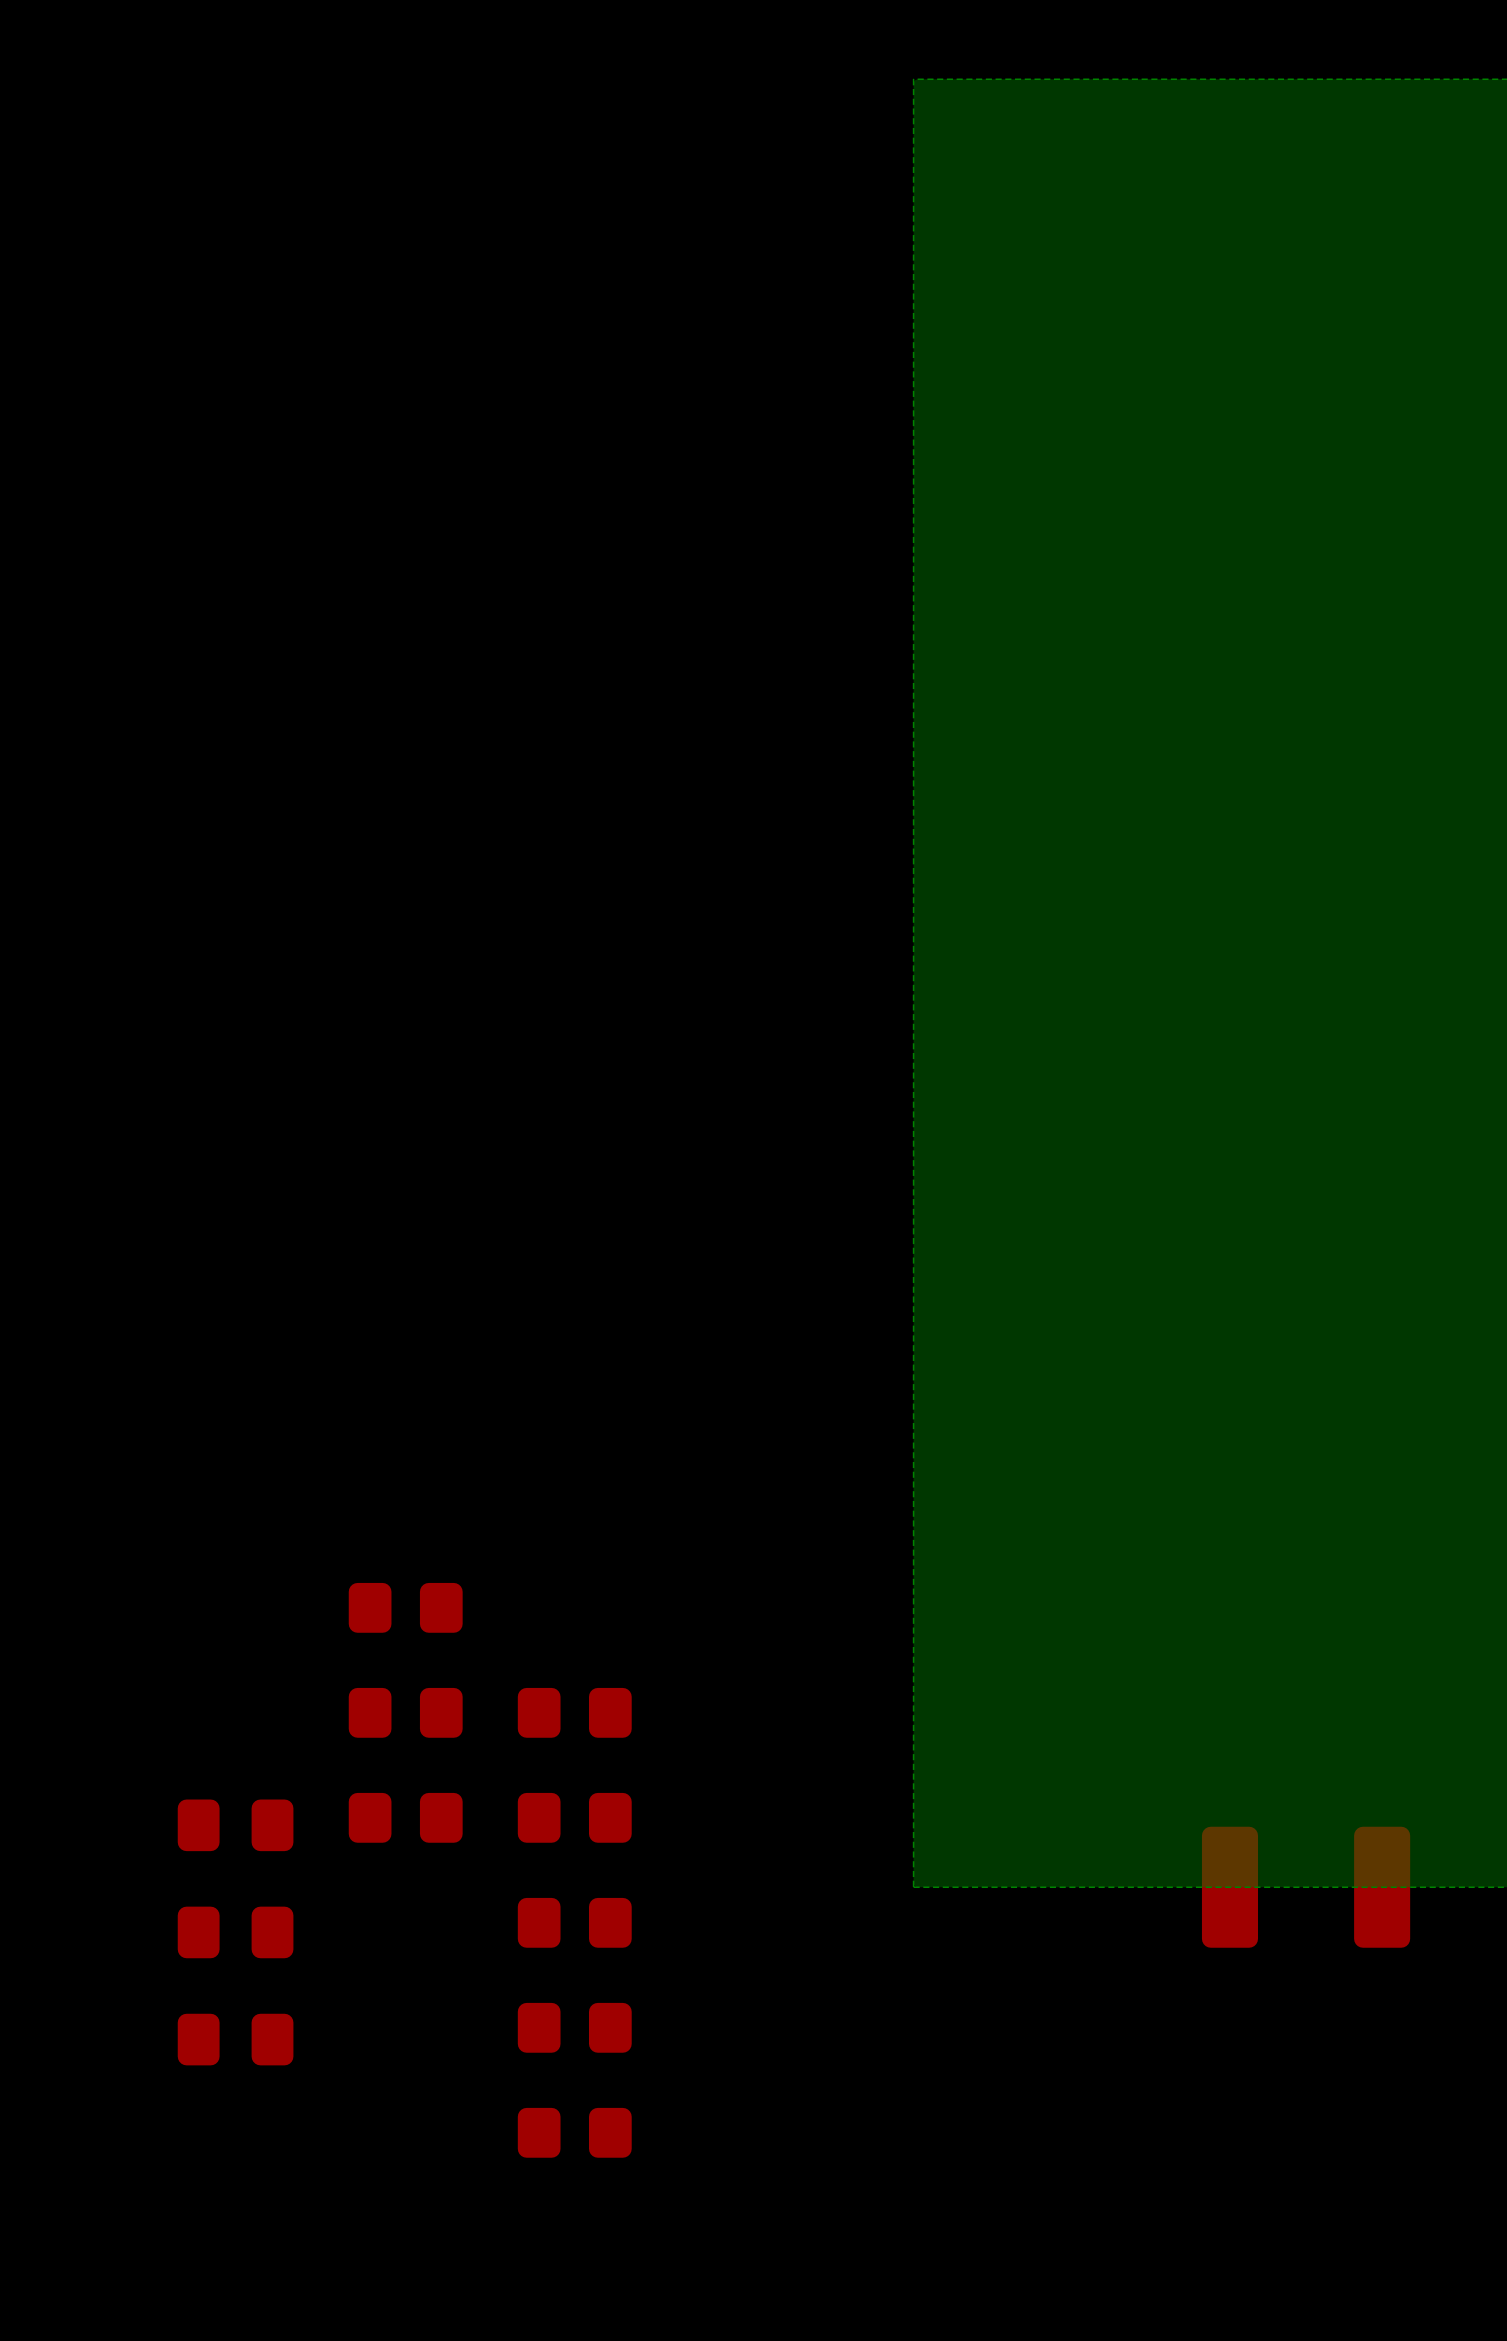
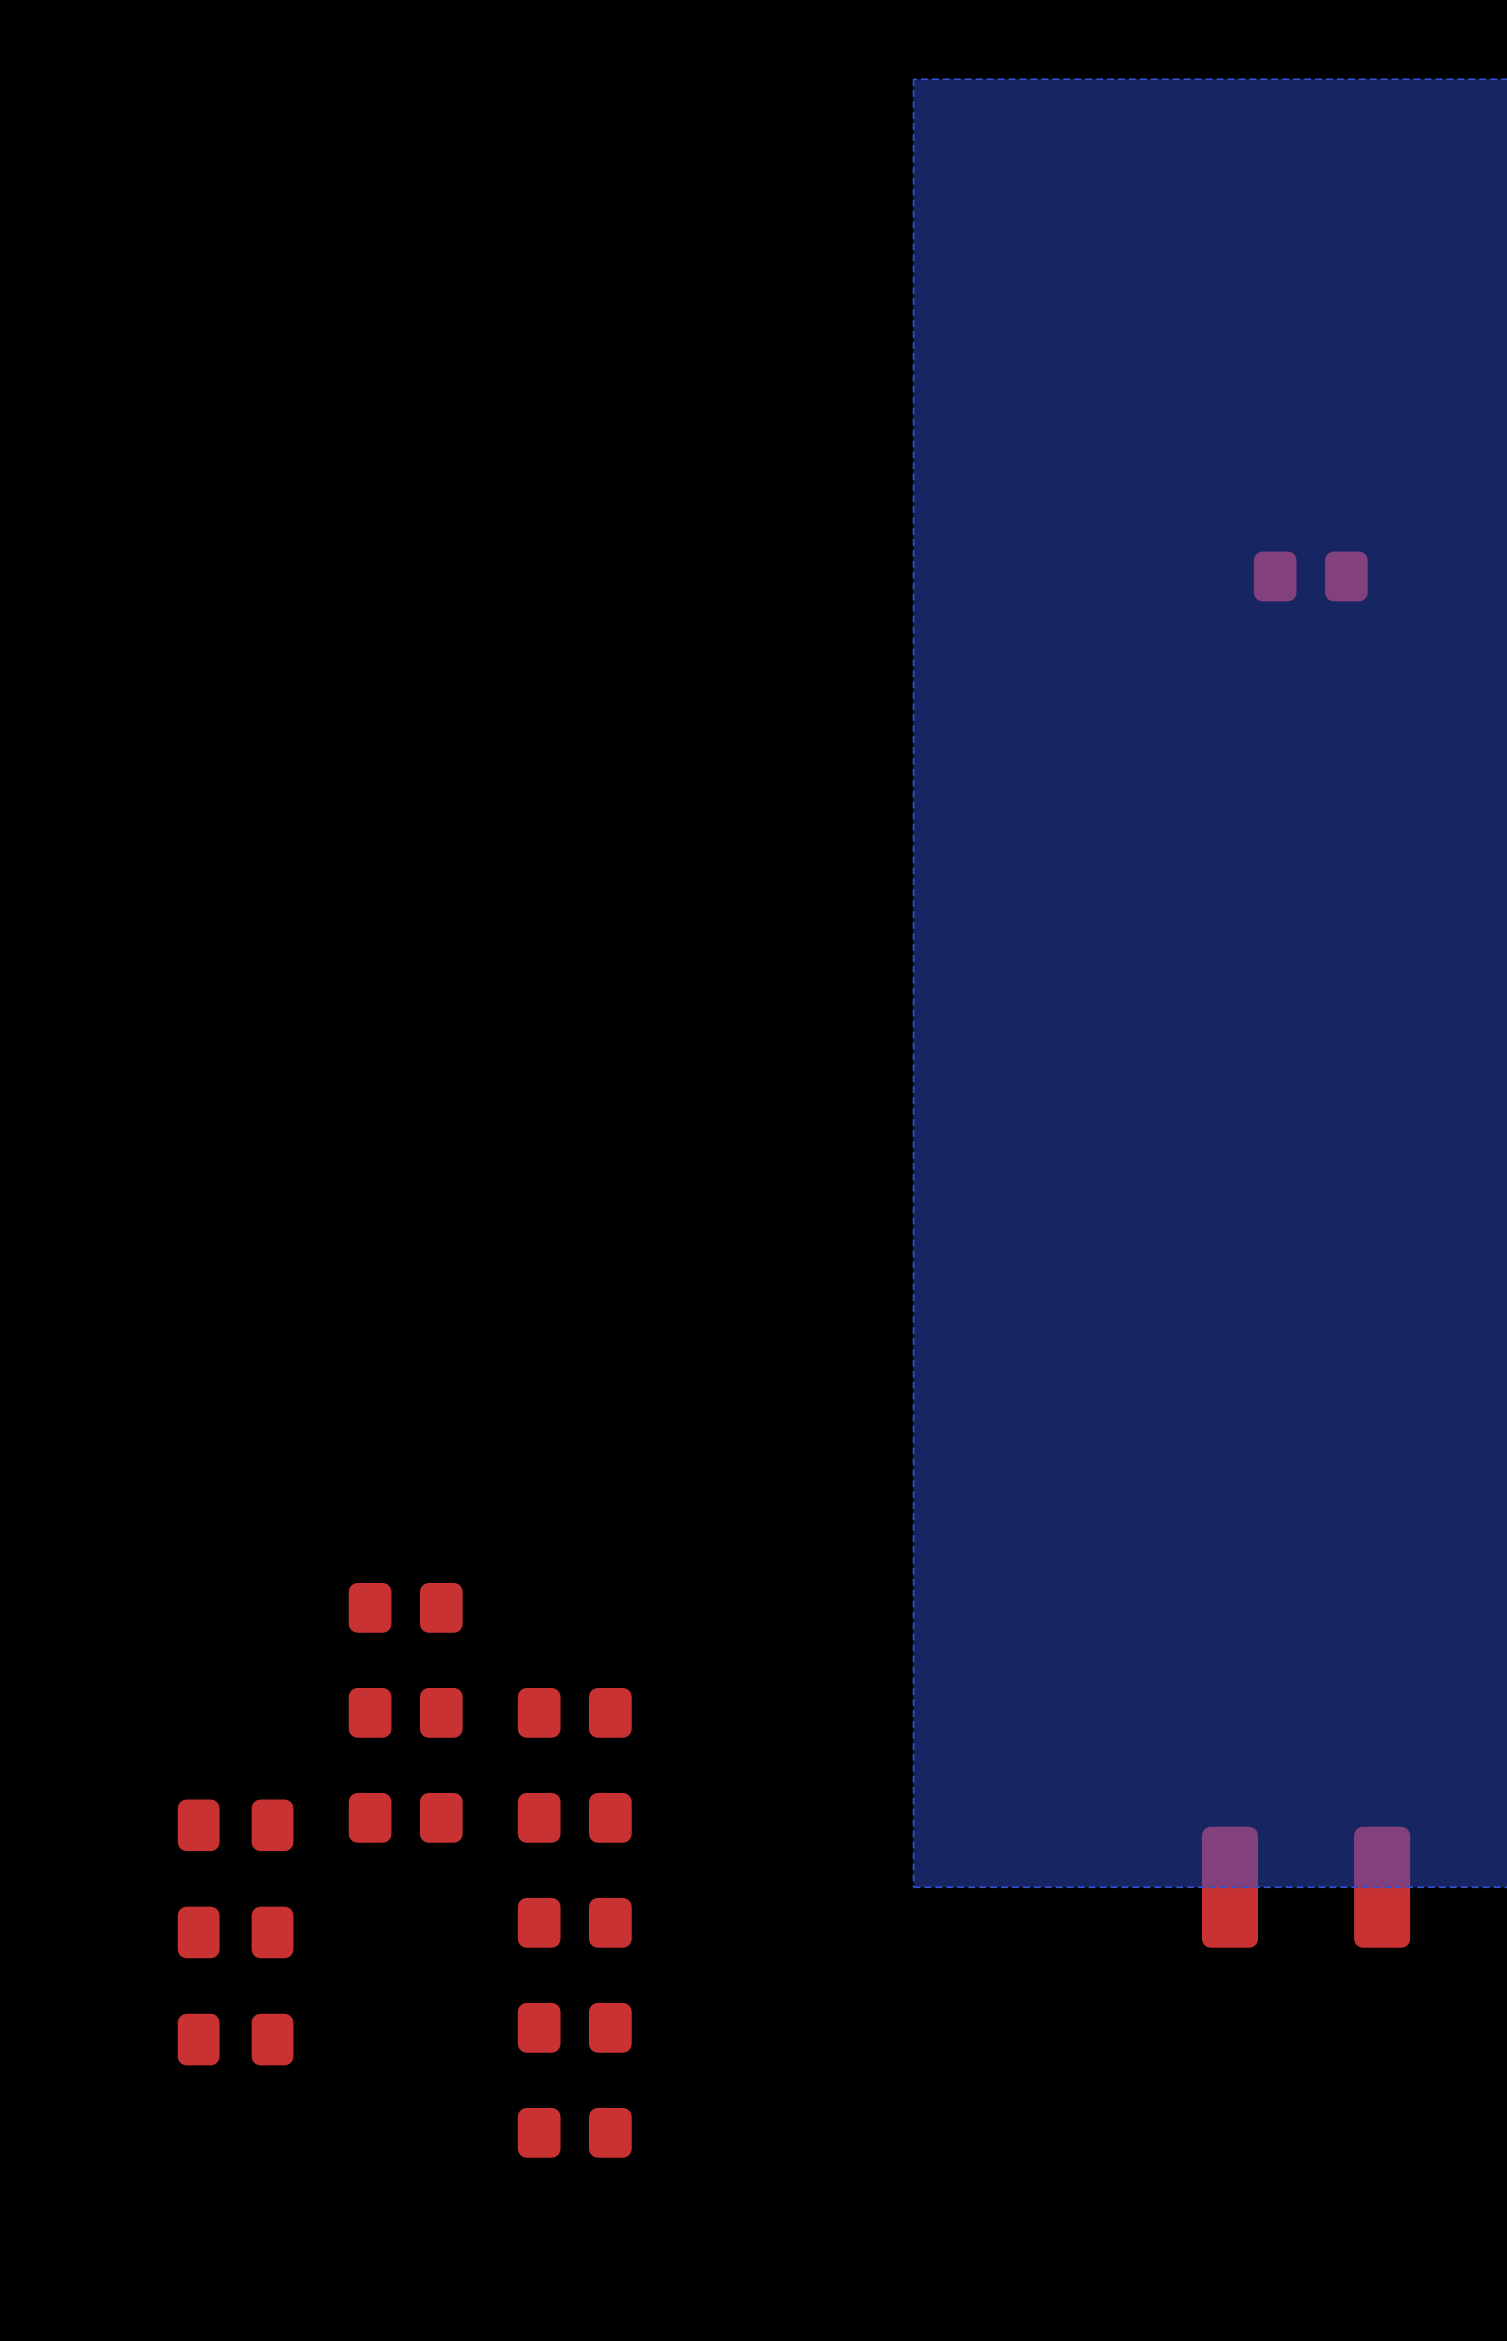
part: none -> (1310, 576)

